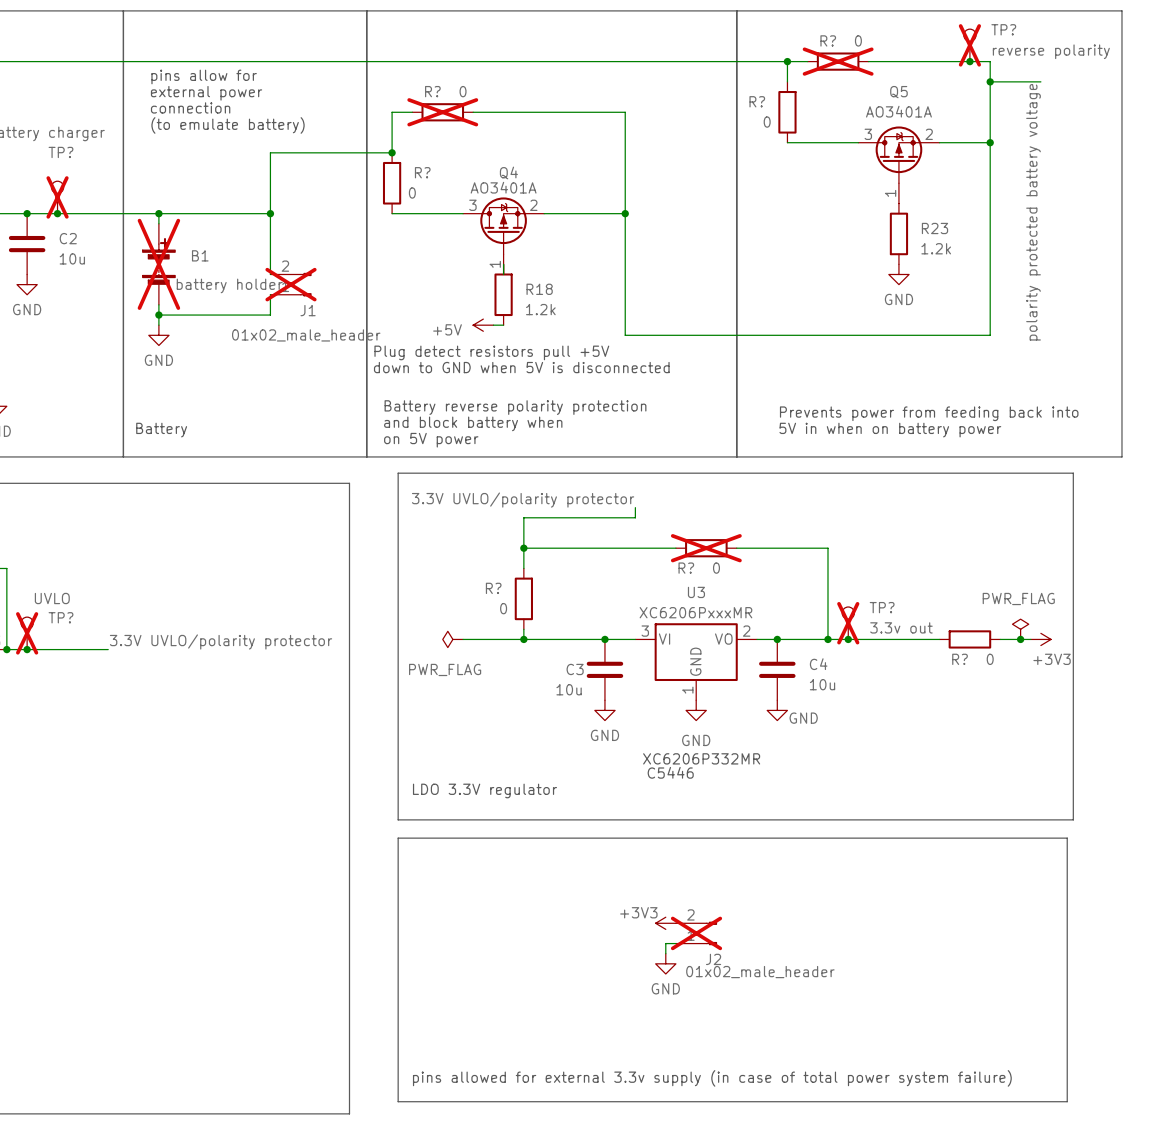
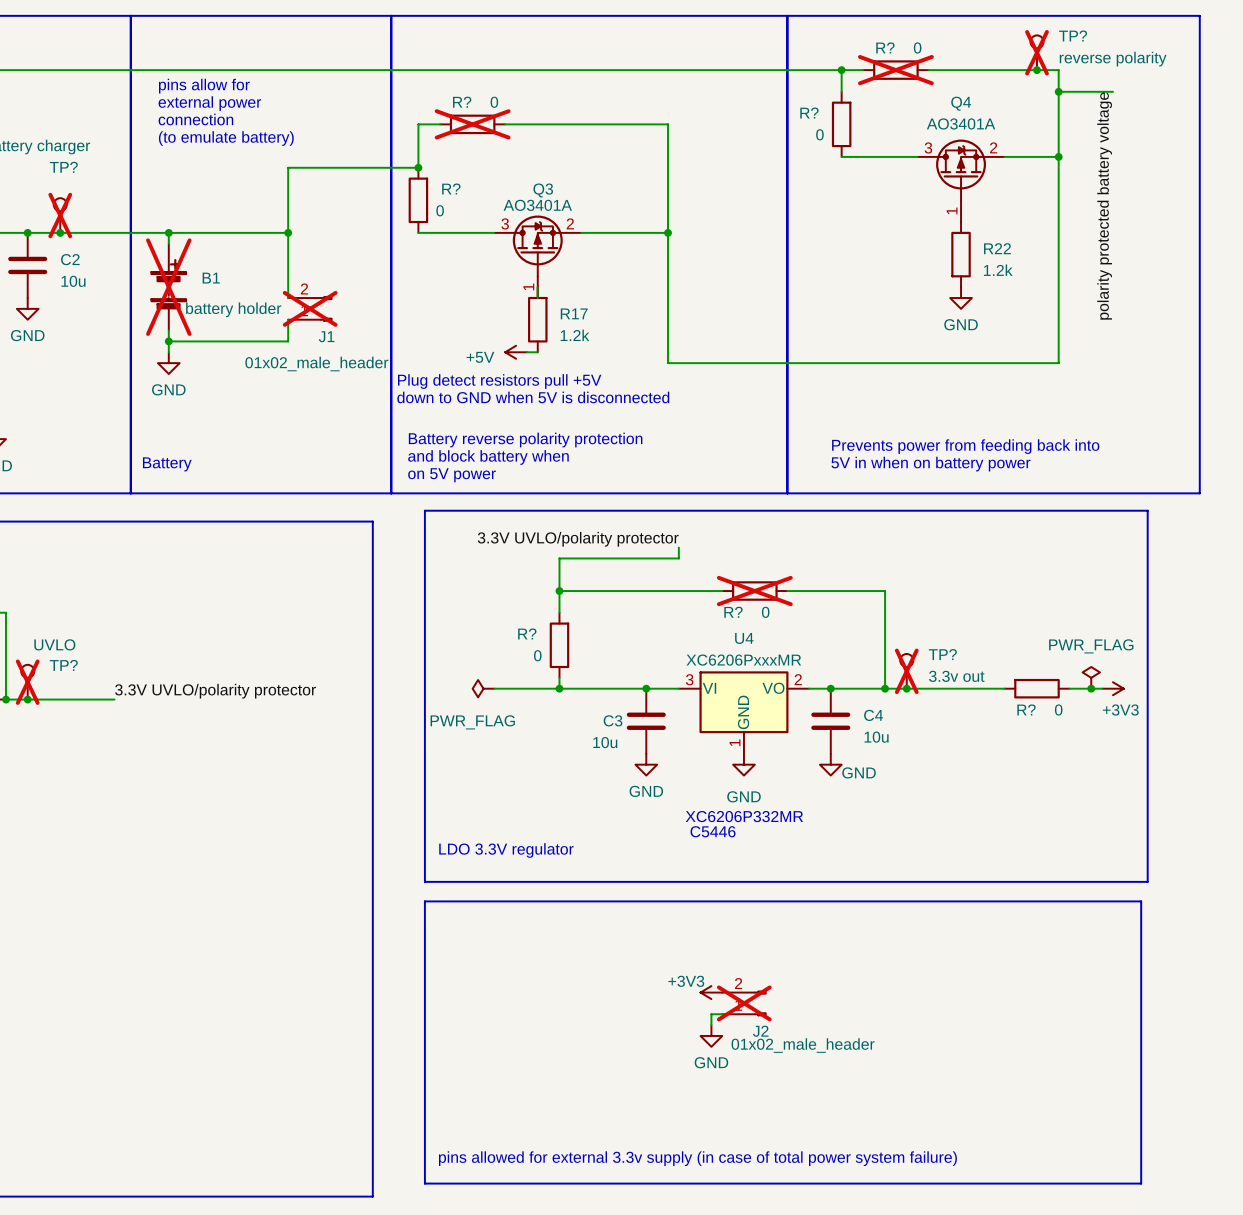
Q5 name: Q5 (898, 92) -> Q4 (961, 103)
Q4 name: Q4 (508, 172) -> Q3 (543, 190)
R23 name: R23 (935, 228) -> R22 (997, 248)
R18 name: R18 (539, 289) -> R17 (574, 313)
U3 name: U3 (696, 592) -> U4 (744, 638)

